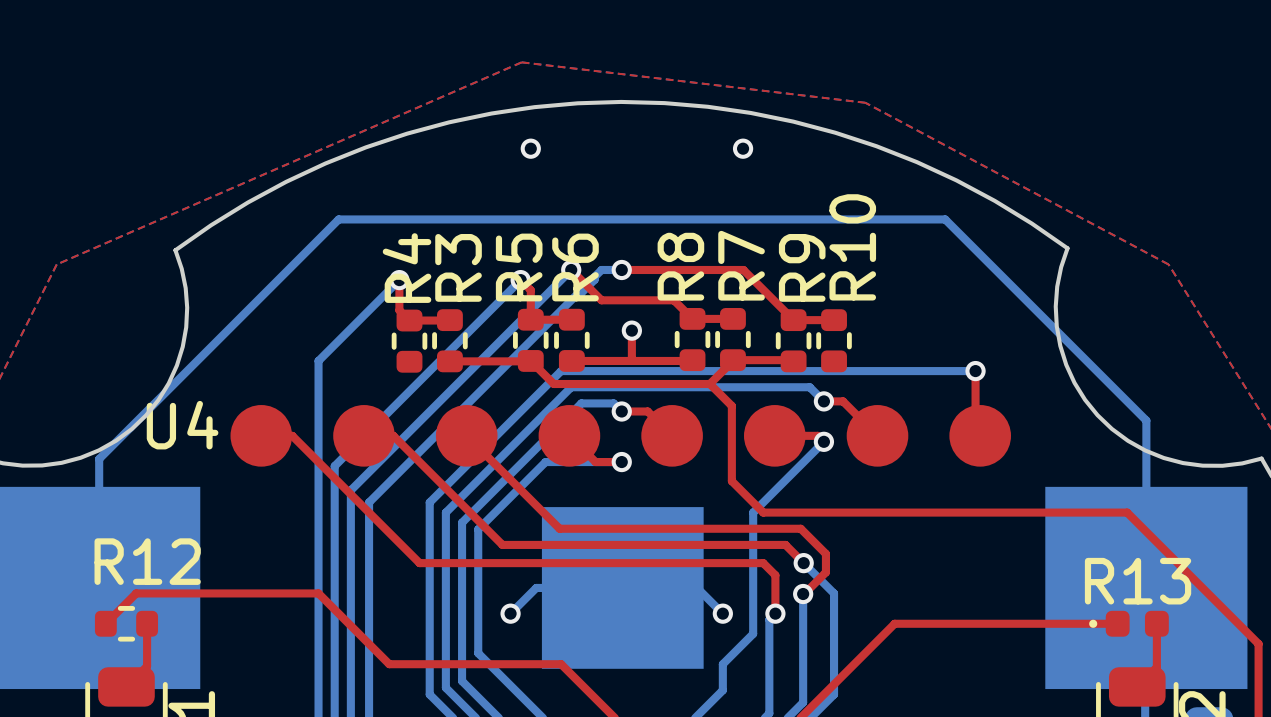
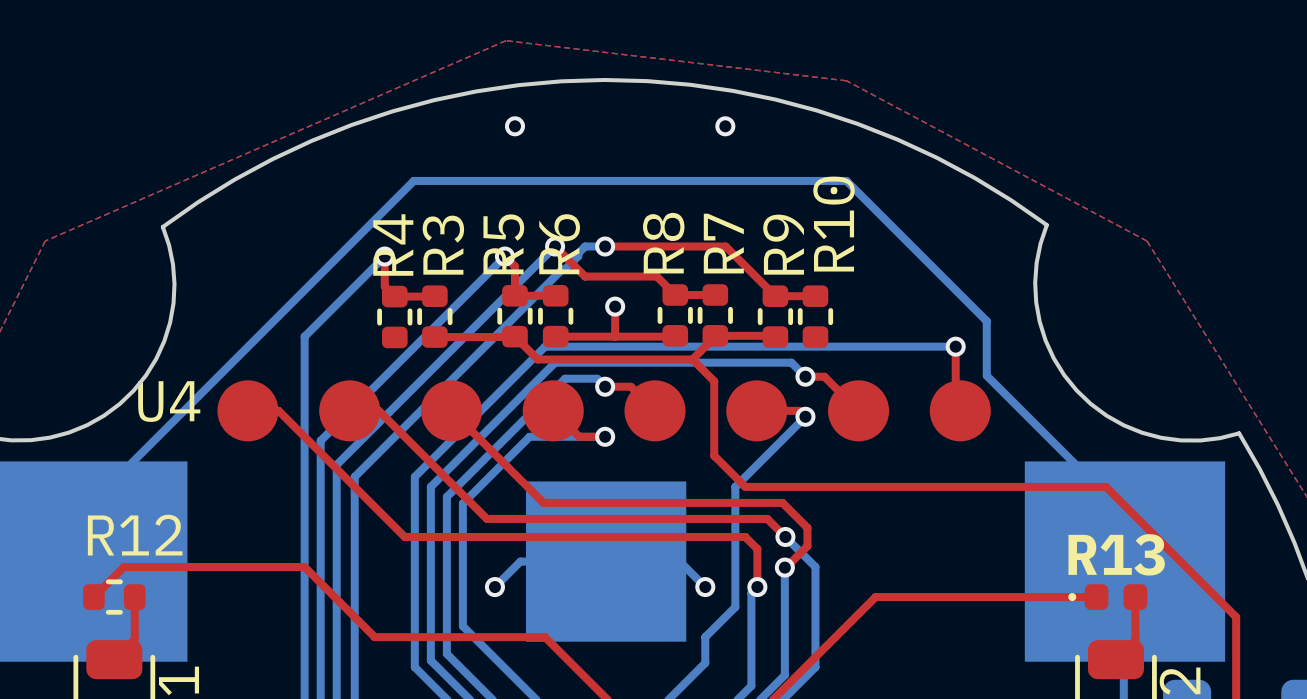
bottom track: (99, 533) (99, 459) (338, 219) (945, 219) (1146, 420) (1146, 539) -> (87, 507) (413, 180) (846, 180) (986, 321) (986, 375) (1124, 513)

